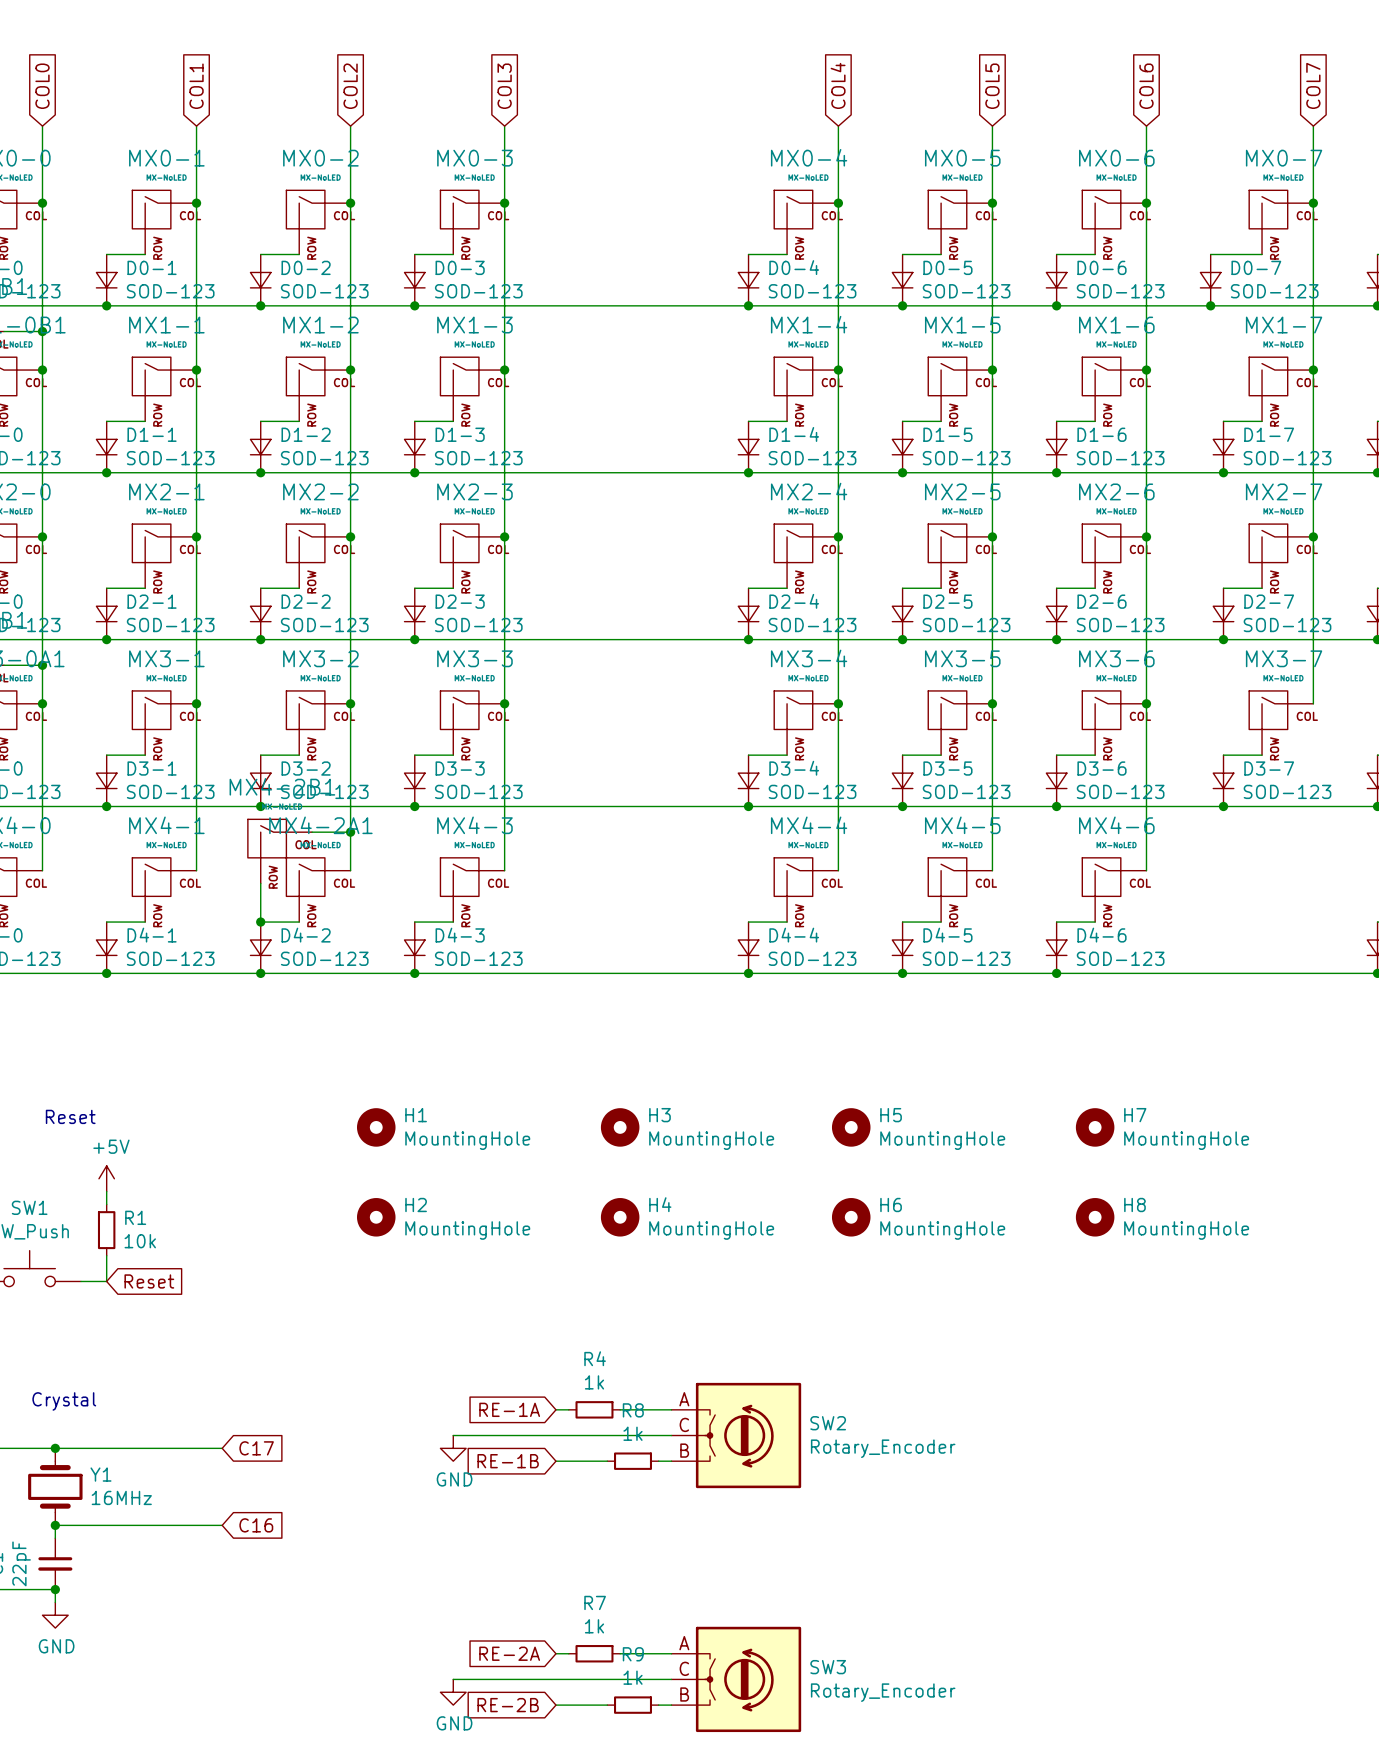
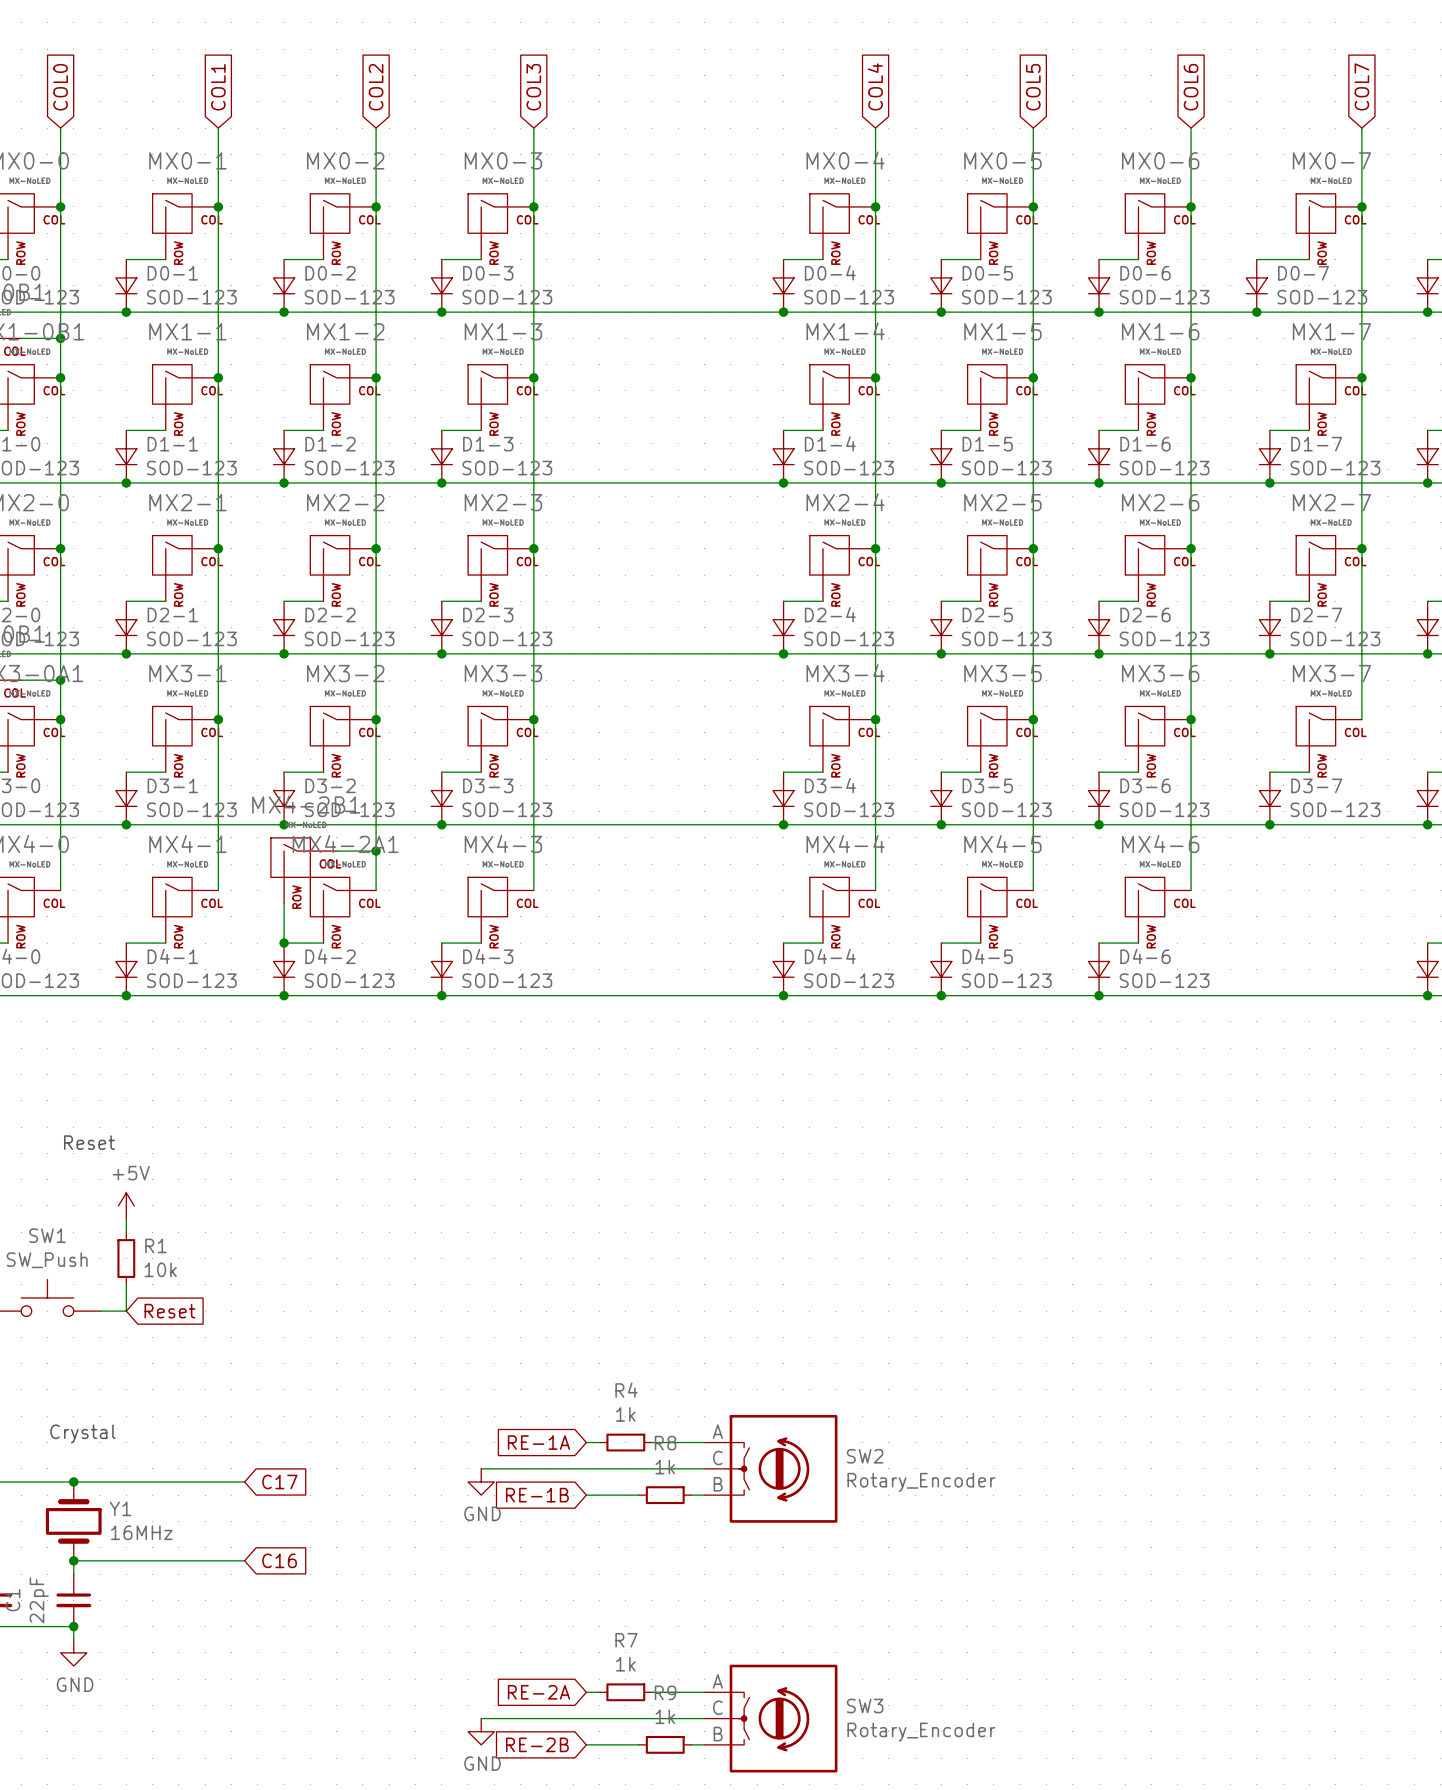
H1: MountingHole (376, 1127) -> none
H3: MountingHole (620, 1127) -> none
H5: MountingHole (851, 1127) -> none
H7: MountingHole (1095, 1127) -> none
H2: MountingHole (376, 1217) -> none
H4: MountingHole (620, 1217) -> none
H6: MountingHole (851, 1217) -> none
H8: MountingHole (1095, 1217) -> none

